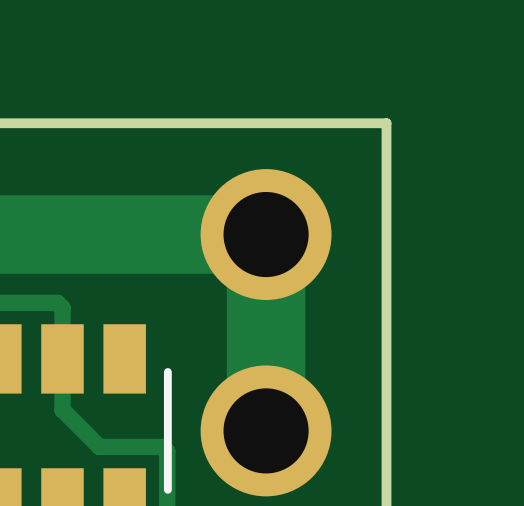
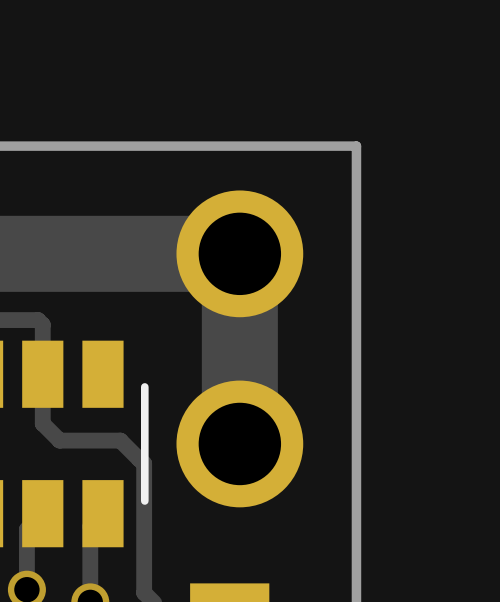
track: (79, 427) (99, 446) (162, 446) -> (59, 440) (120, 440) (140, 459)

